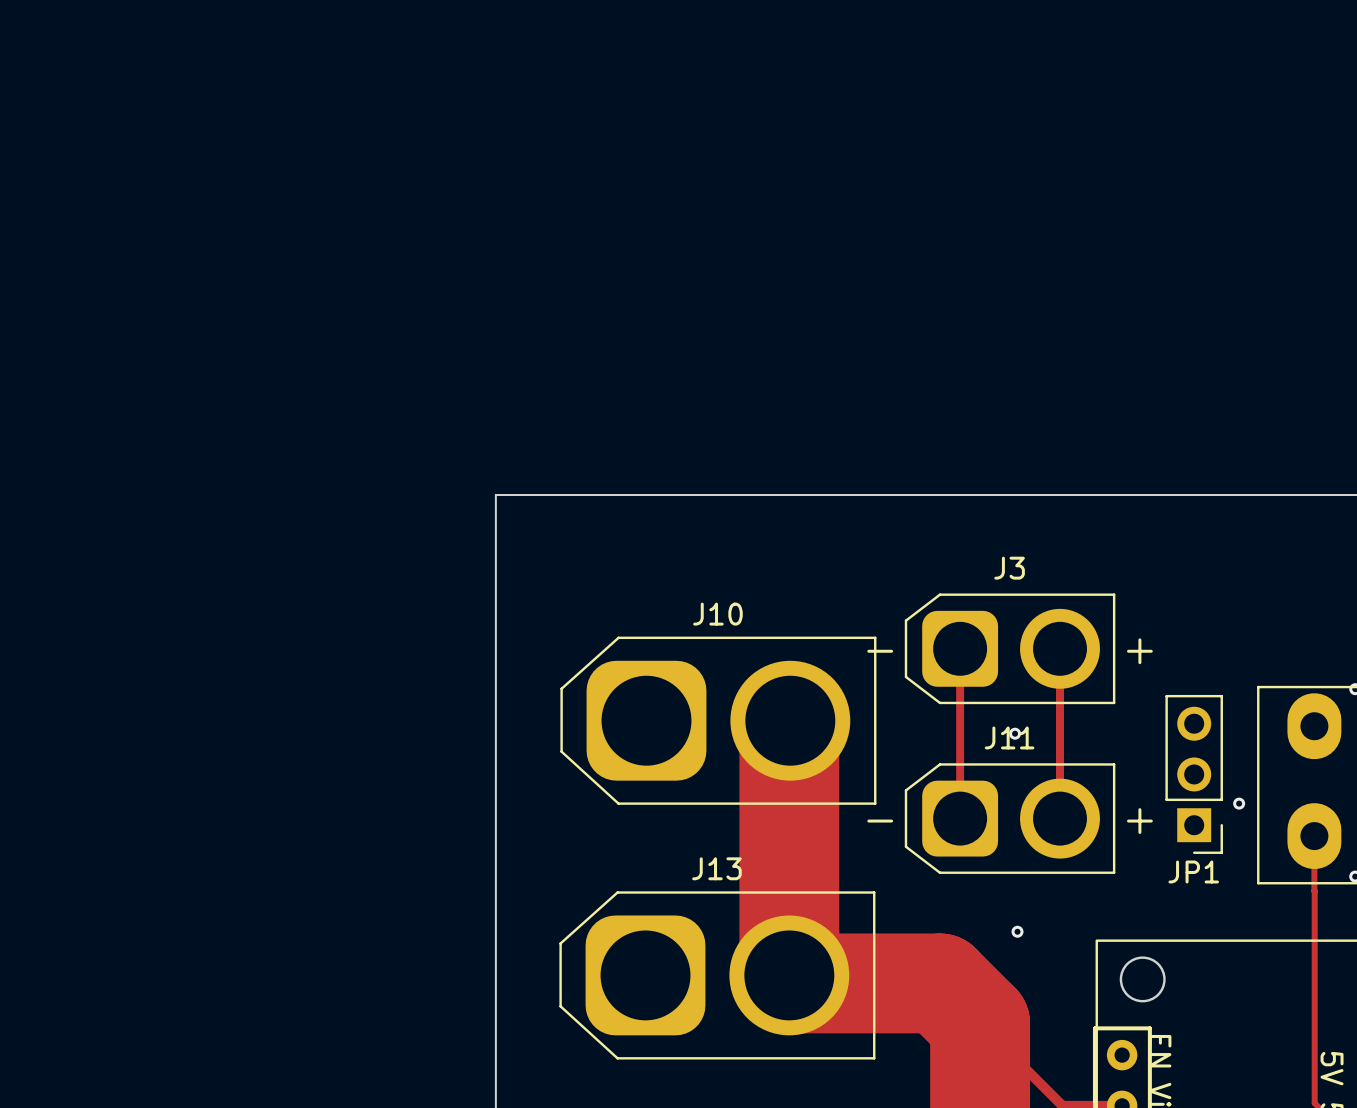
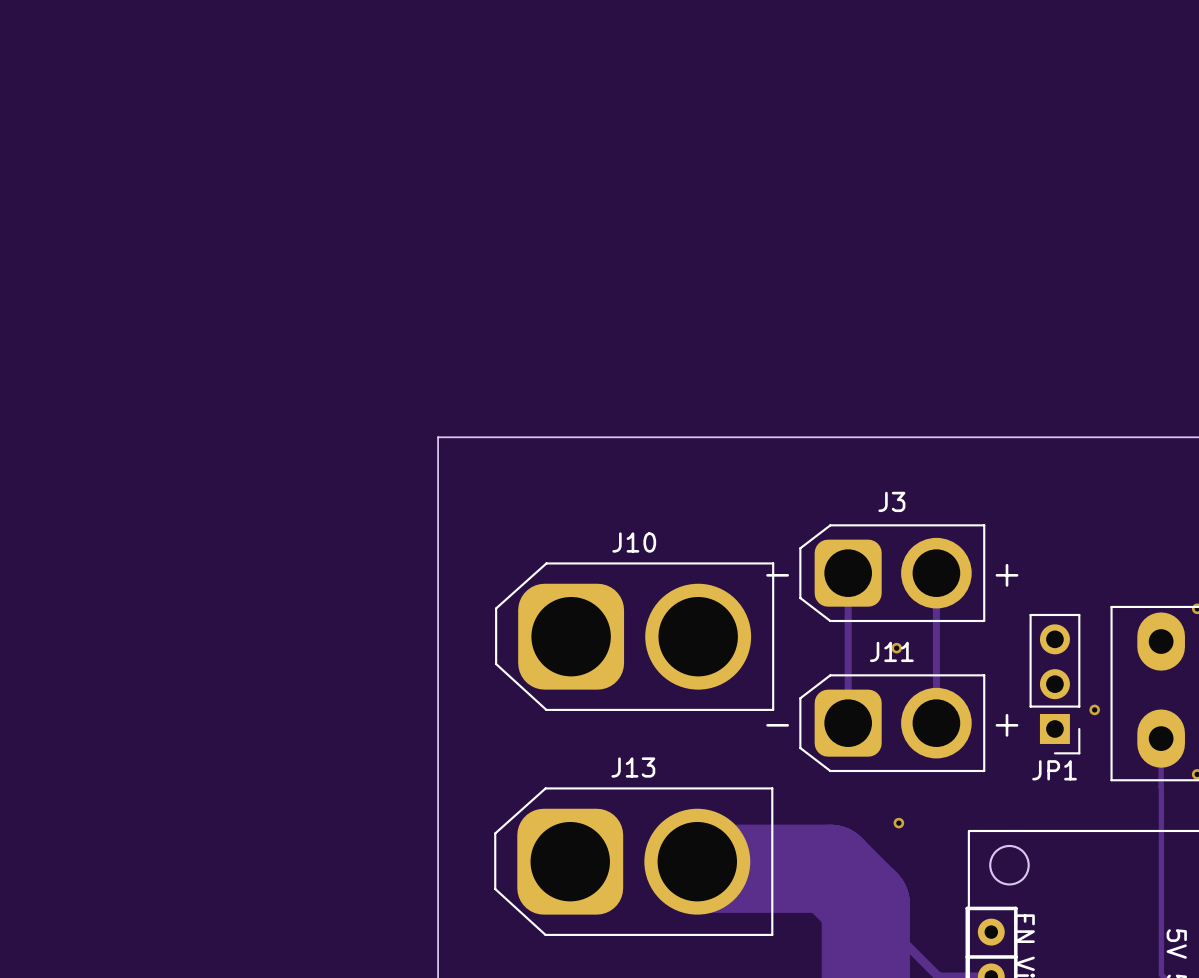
track: (790, 720) (789, 975) -> none
line: none -> (967, 956) (1015, 956)

